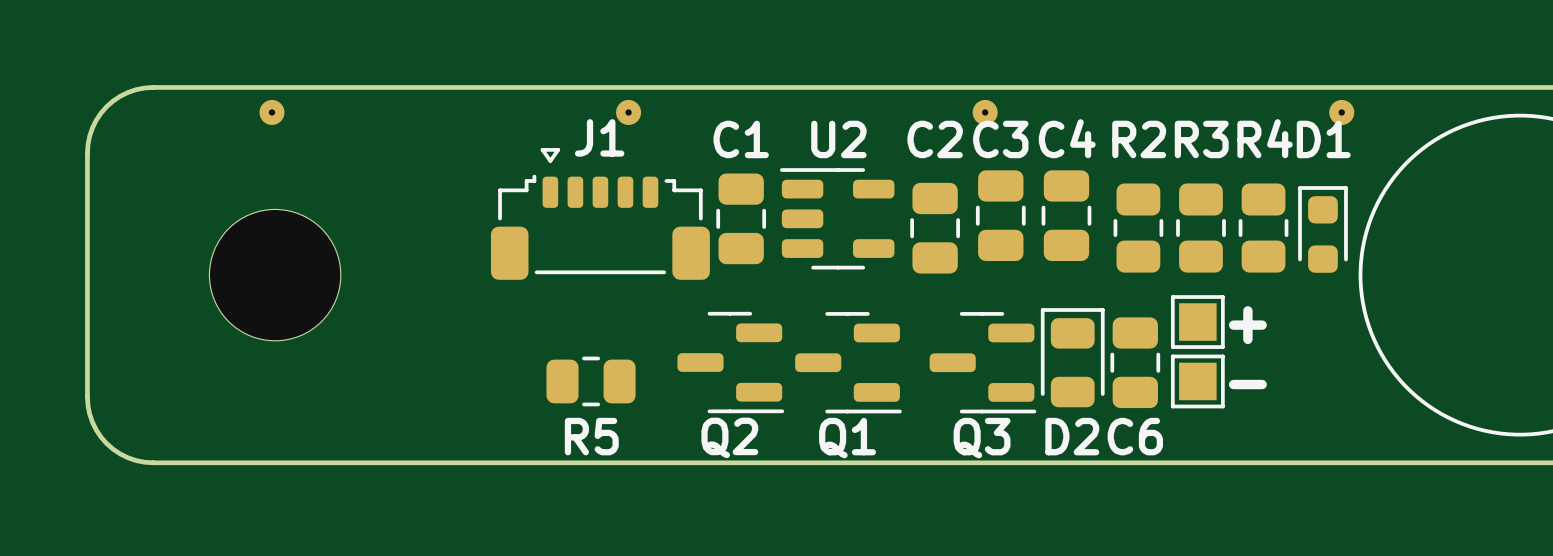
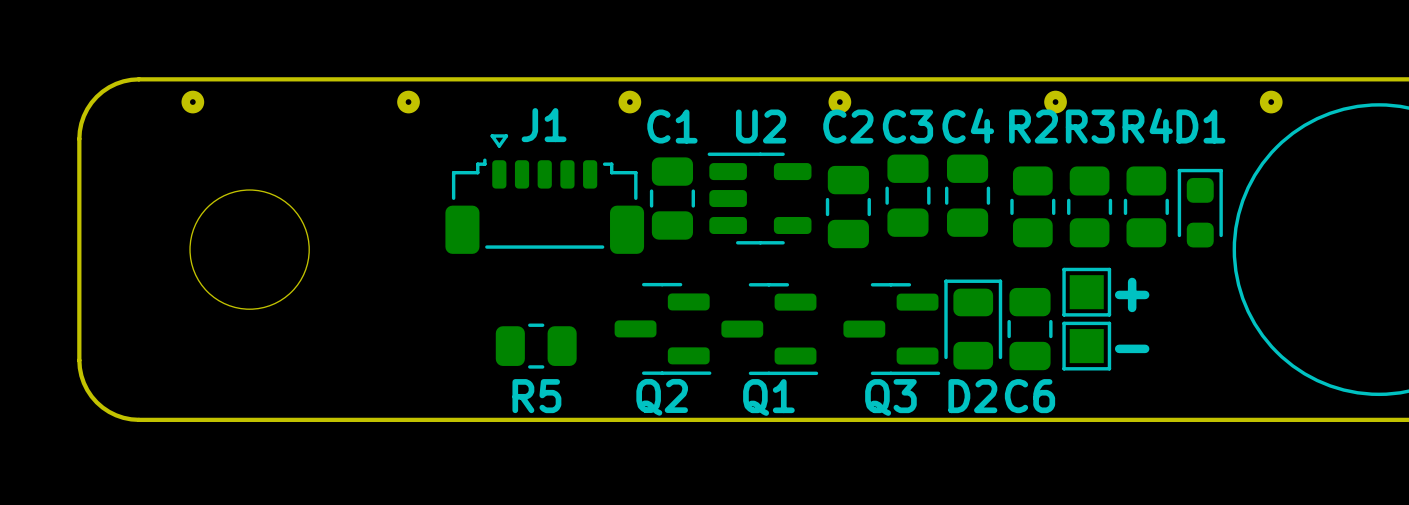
part position: (271, 112) -> (192, 102)
part: none -> (408, 102)
part position: (628, 112) -> (629, 102)
part position: (985, 112) -> (839, 102)
part: none -> (1055, 102)
part position: (1341, 112) -> (1271, 102)

